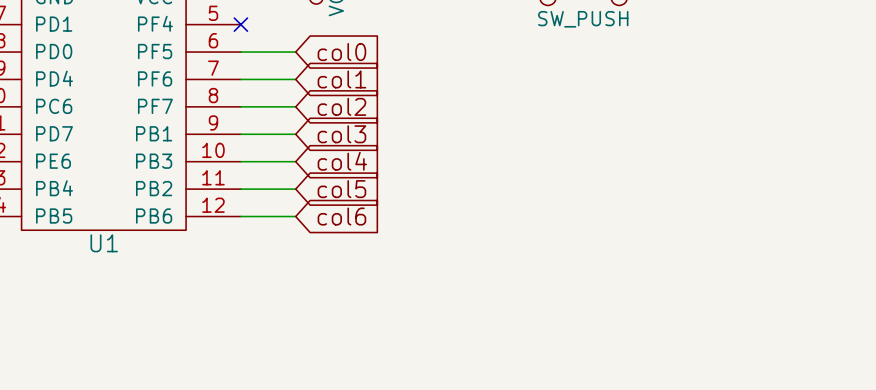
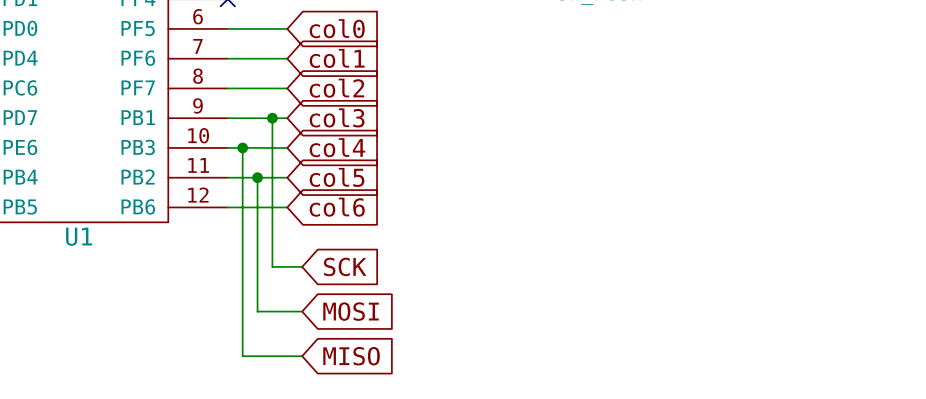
wire: none -> (272, 118) (272, 266) (302, 266)
junction: none -> (272, 118)
wire: none -> (242, 147) (242, 356) (302, 356)
junction: none -> (242, 147)
wire: none -> (257, 177) (257, 311) (302, 311)
junction: none -> (257, 177)
global label: none -> SCK (345, 266)
global label: none -> MOSI (351, 311)
global label: none -> MISO (351, 356)

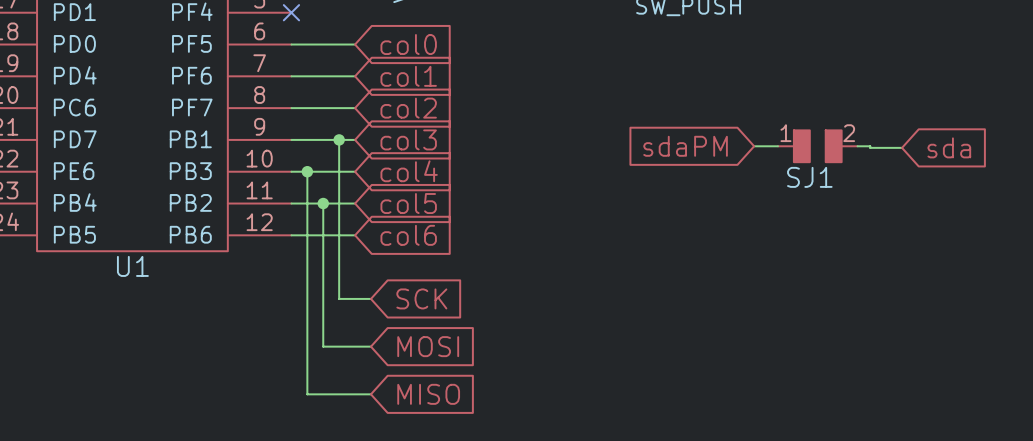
global label: none -> sdaPM (685, 146)
wire: none -> (754, 146) (778, 146)
SJ1: none -> (817, 146)
wire: none -> (857, 146) (902, 147)
global label: none -> sda (949, 147)

